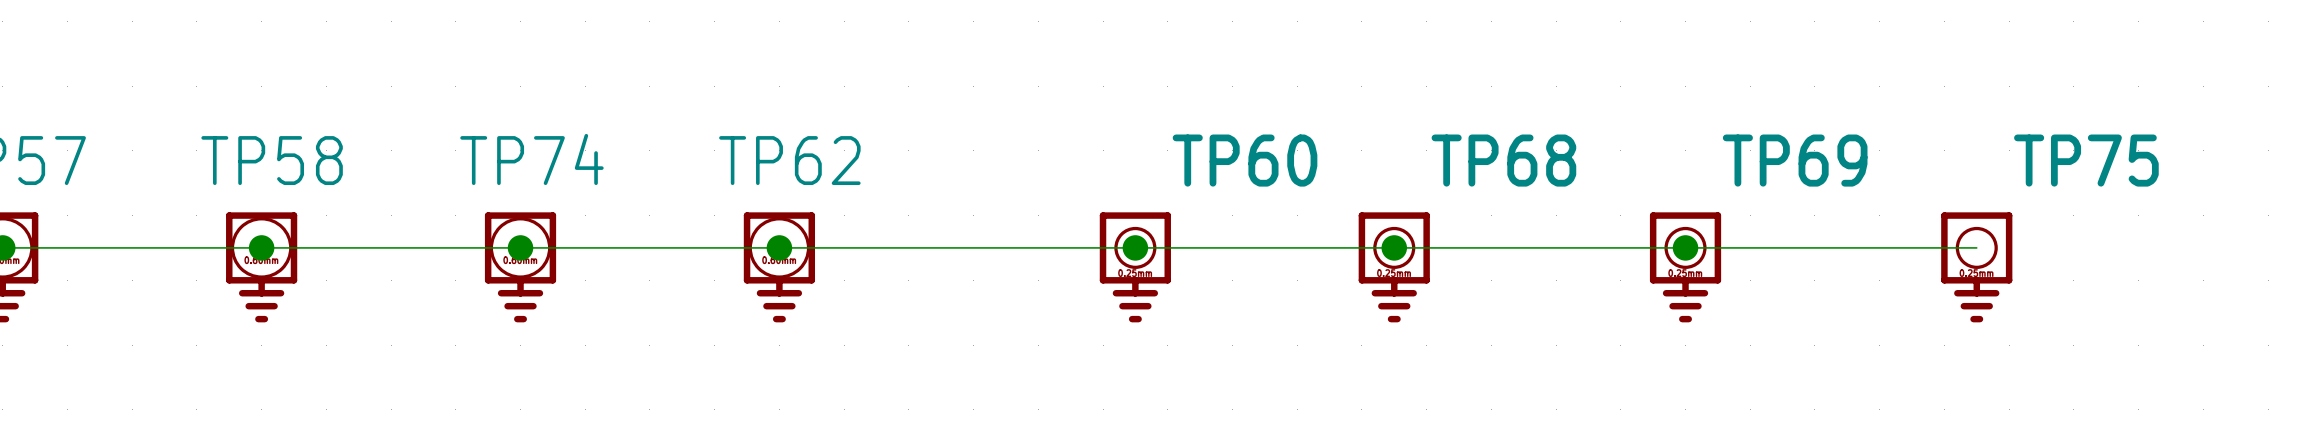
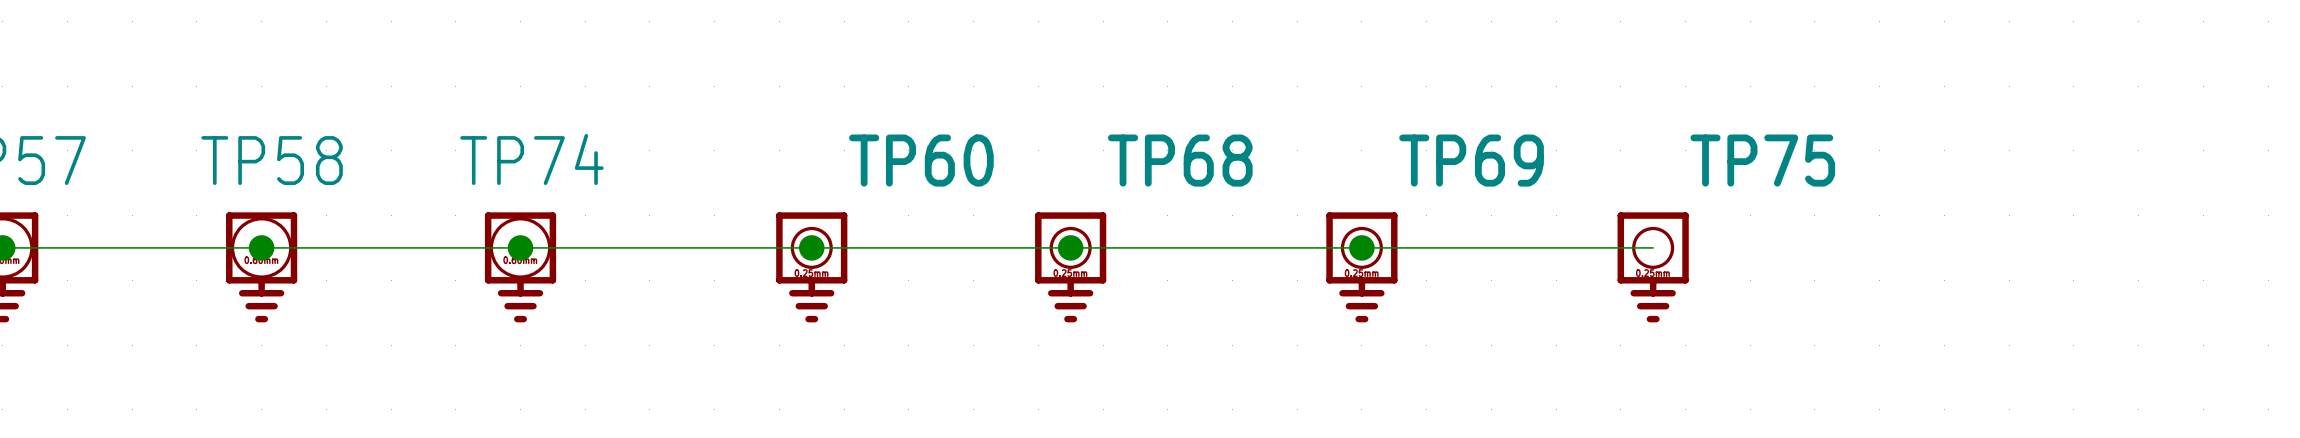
junction position: (779, 247) -> (811, 247)
junction position: (1135, 247) -> (1070, 247)
junction position: (1394, 247) -> (1361, 247)
wire: (1653, 247) (1976, 247) -> none
junction: (1685, 247) -> none
TP62: (779, 267) -> none
TP60 position: (1135, 267) -> (811, 267)
TP68 position: (1394, 267) -> (1070, 267)
TP69 position: (1685, 267) -> (1361, 267)
TP75 position: (1976, 267) -> (1653, 267)

